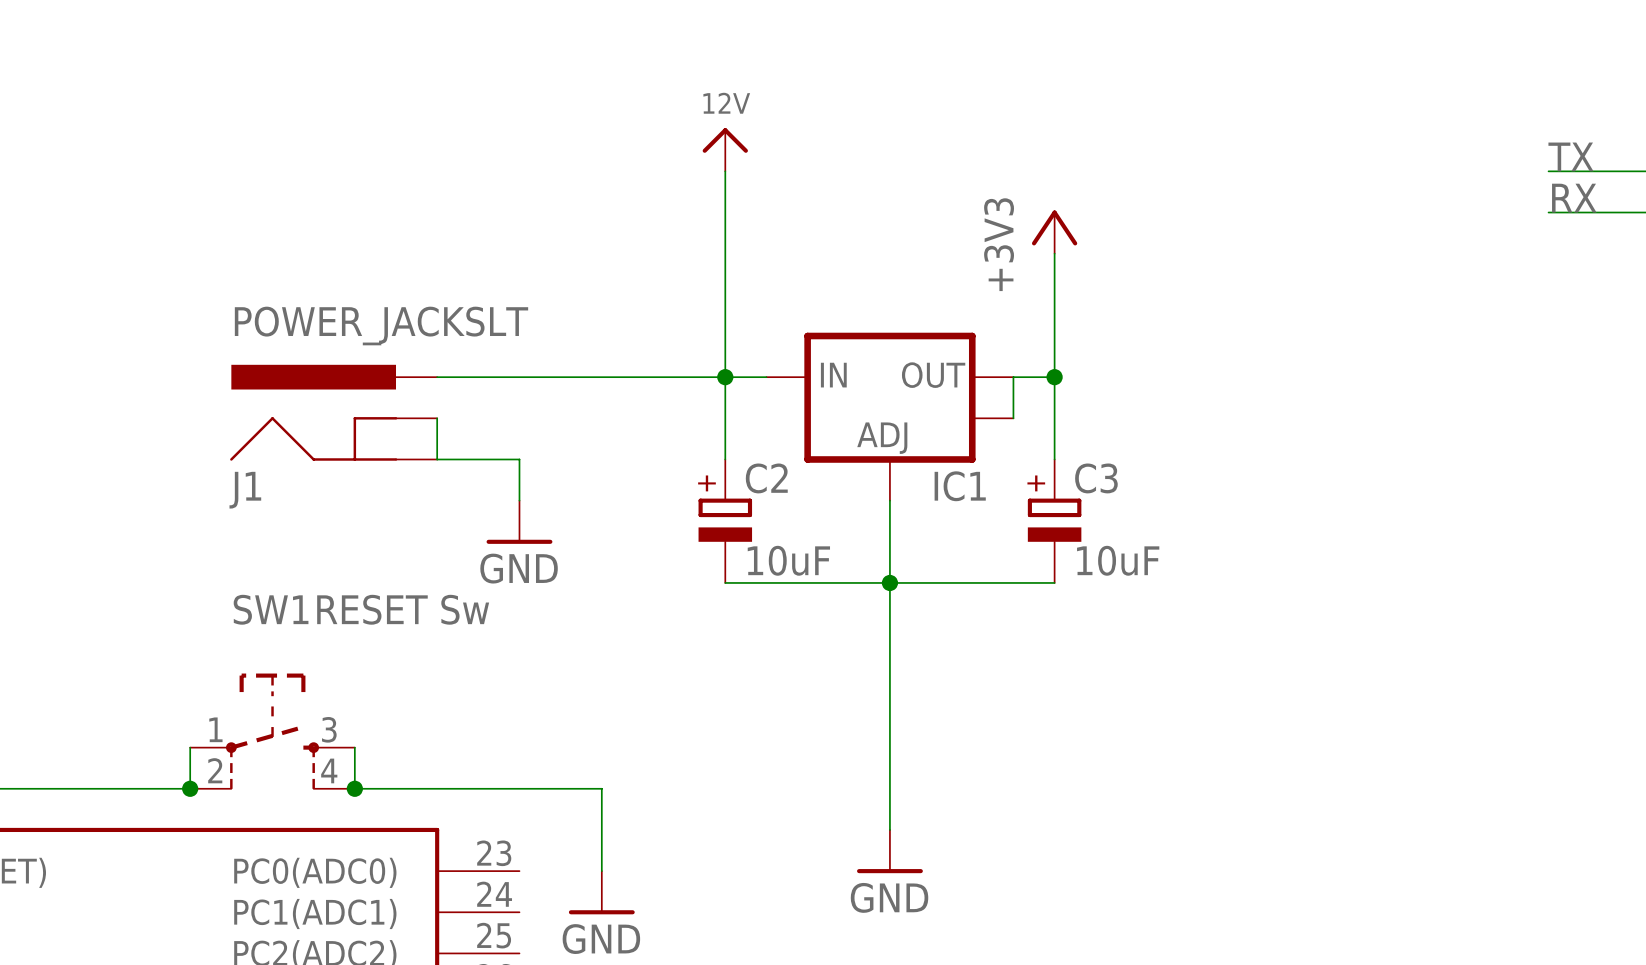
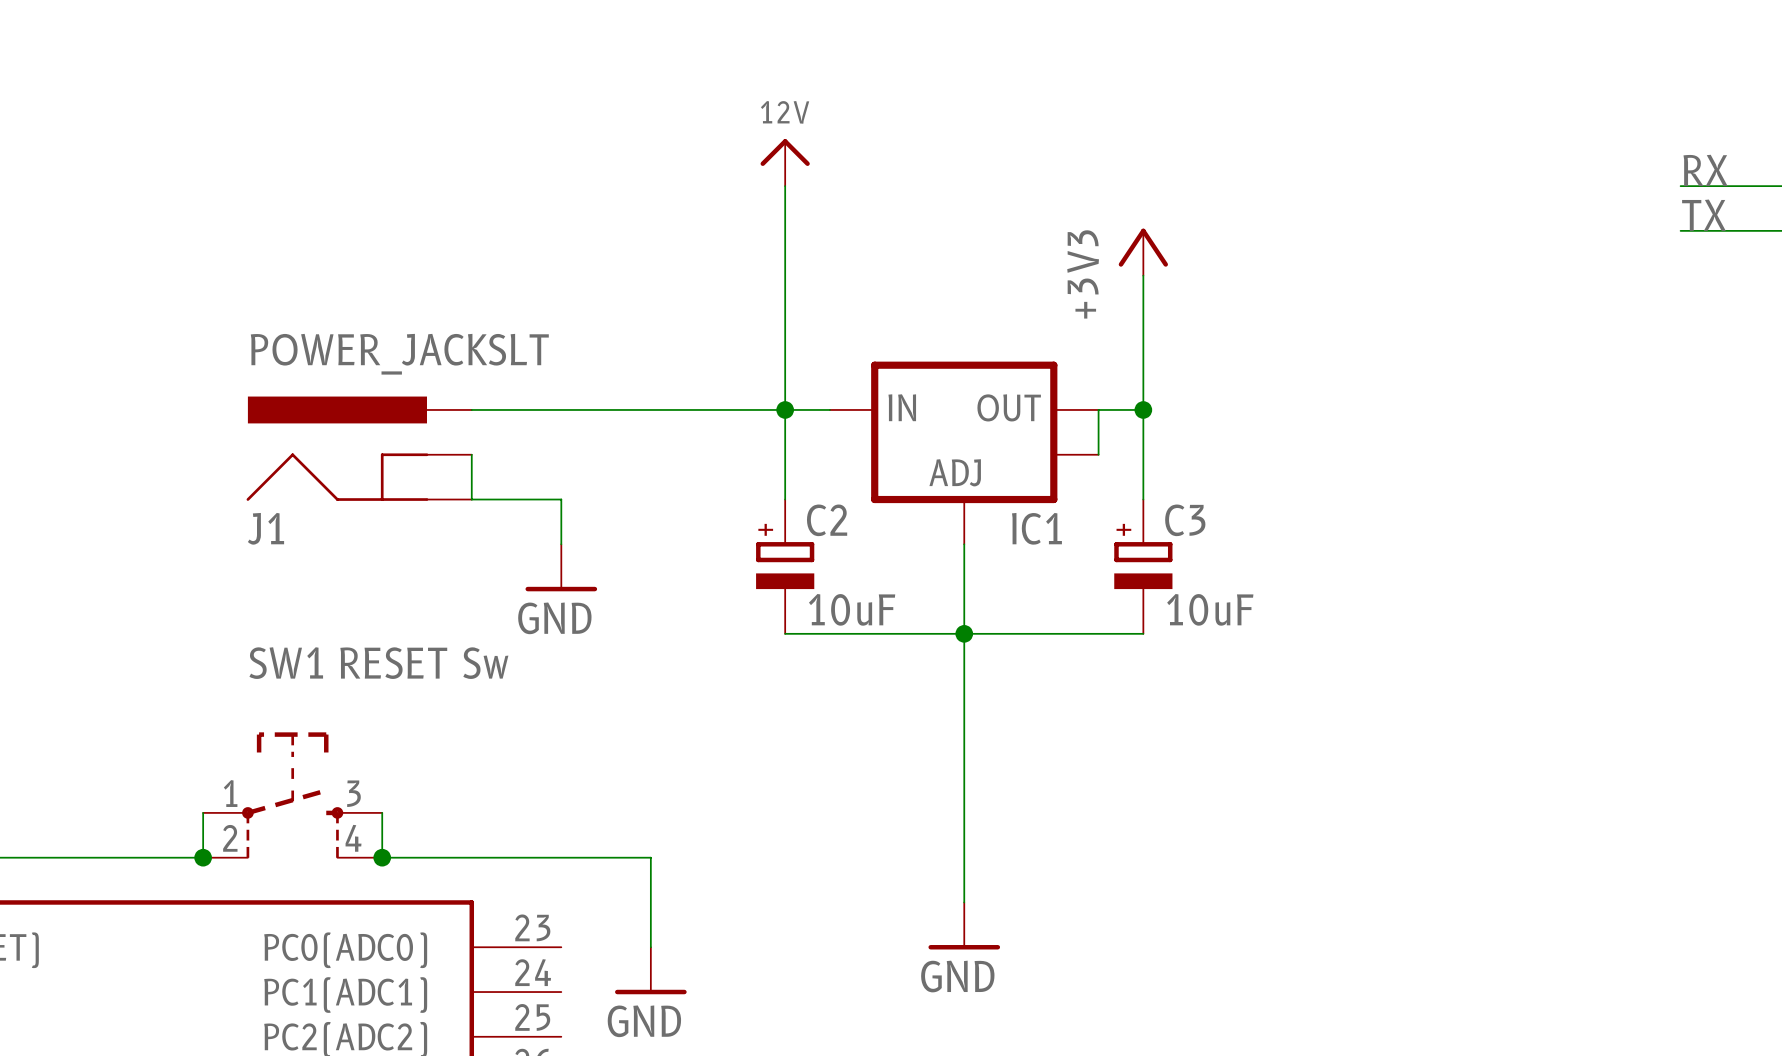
label: TX (1570, 156) -> RX (1705, 170)
label: RX (1574, 198) -> TX (1703, 215)

